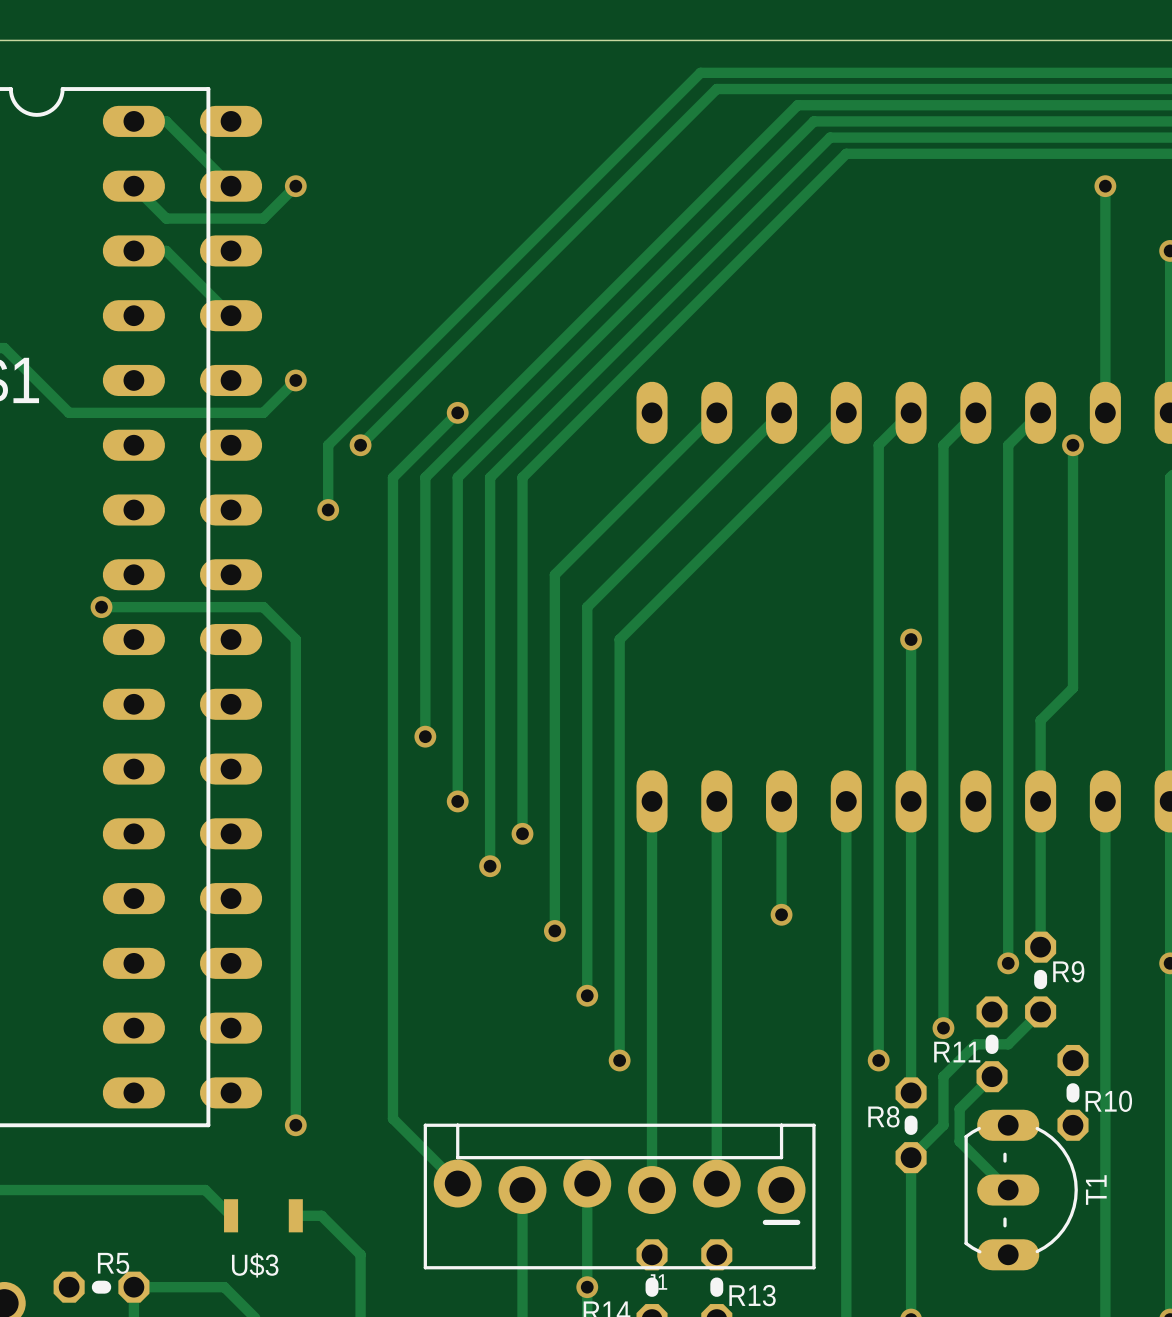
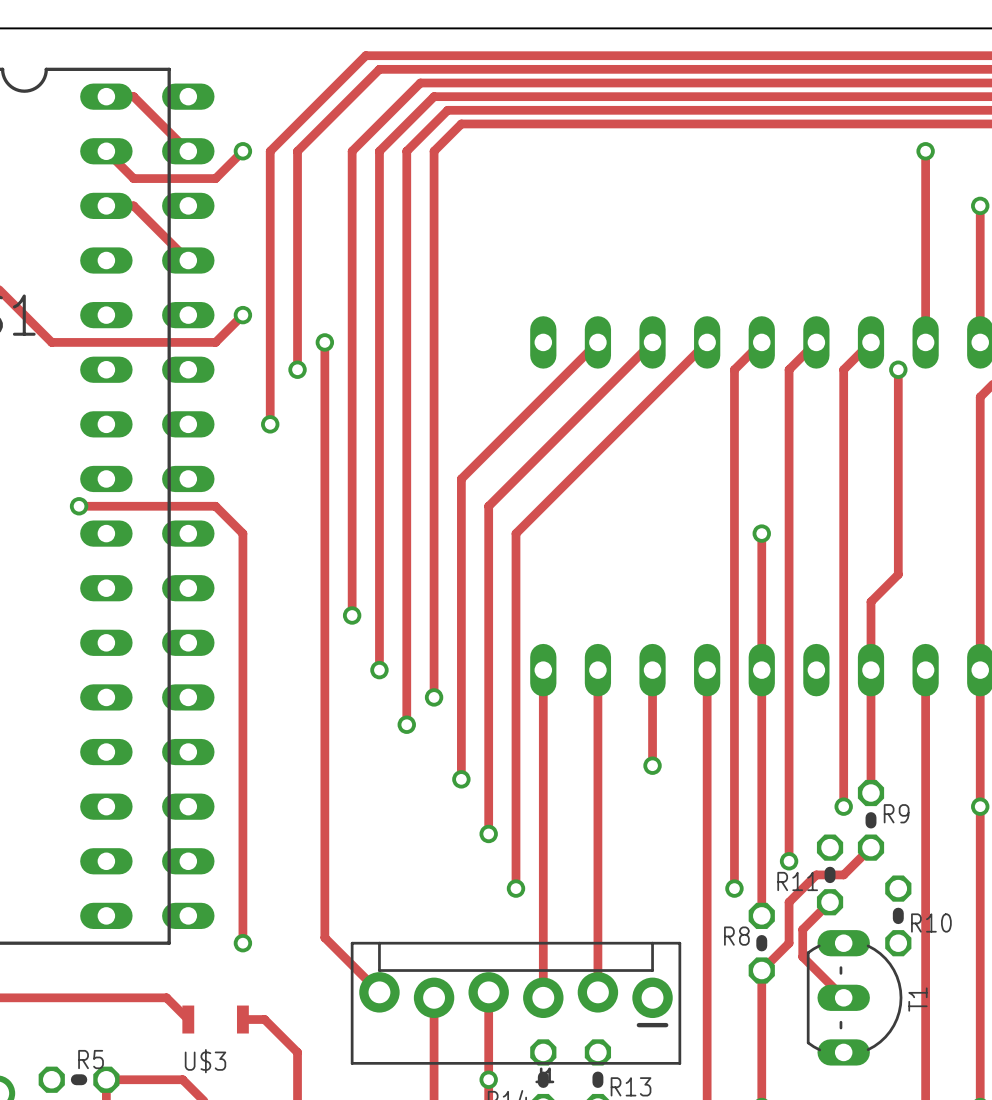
track: (700, 72) (328, 445) -> (584, 55) (365, 55) (270, 151) (270, 369)
track: (716, 89) (360, 445) -> (597, 69) (379, 69) (297, 151) (297, 369)
track: (797, 105) (425, 477) -> (666, 83) (420, 83) (352, 151) (352, 397)
track: (813, 121) (457, 477) -> (679, 96) (434, 96) (379, 151) (379, 397)
track: (830, 137) (490, 477) -> (693, 110) (447, 110) (406, 151) (406, 397)
track: (846, 153) (522, 477) -> (707, 123) (461, 123) (434, 151) (434, 397)
track: (457, 412) (392, 477) -> (324, 342) (324, 397)
via position: (457, 412) -> (324, 342)

